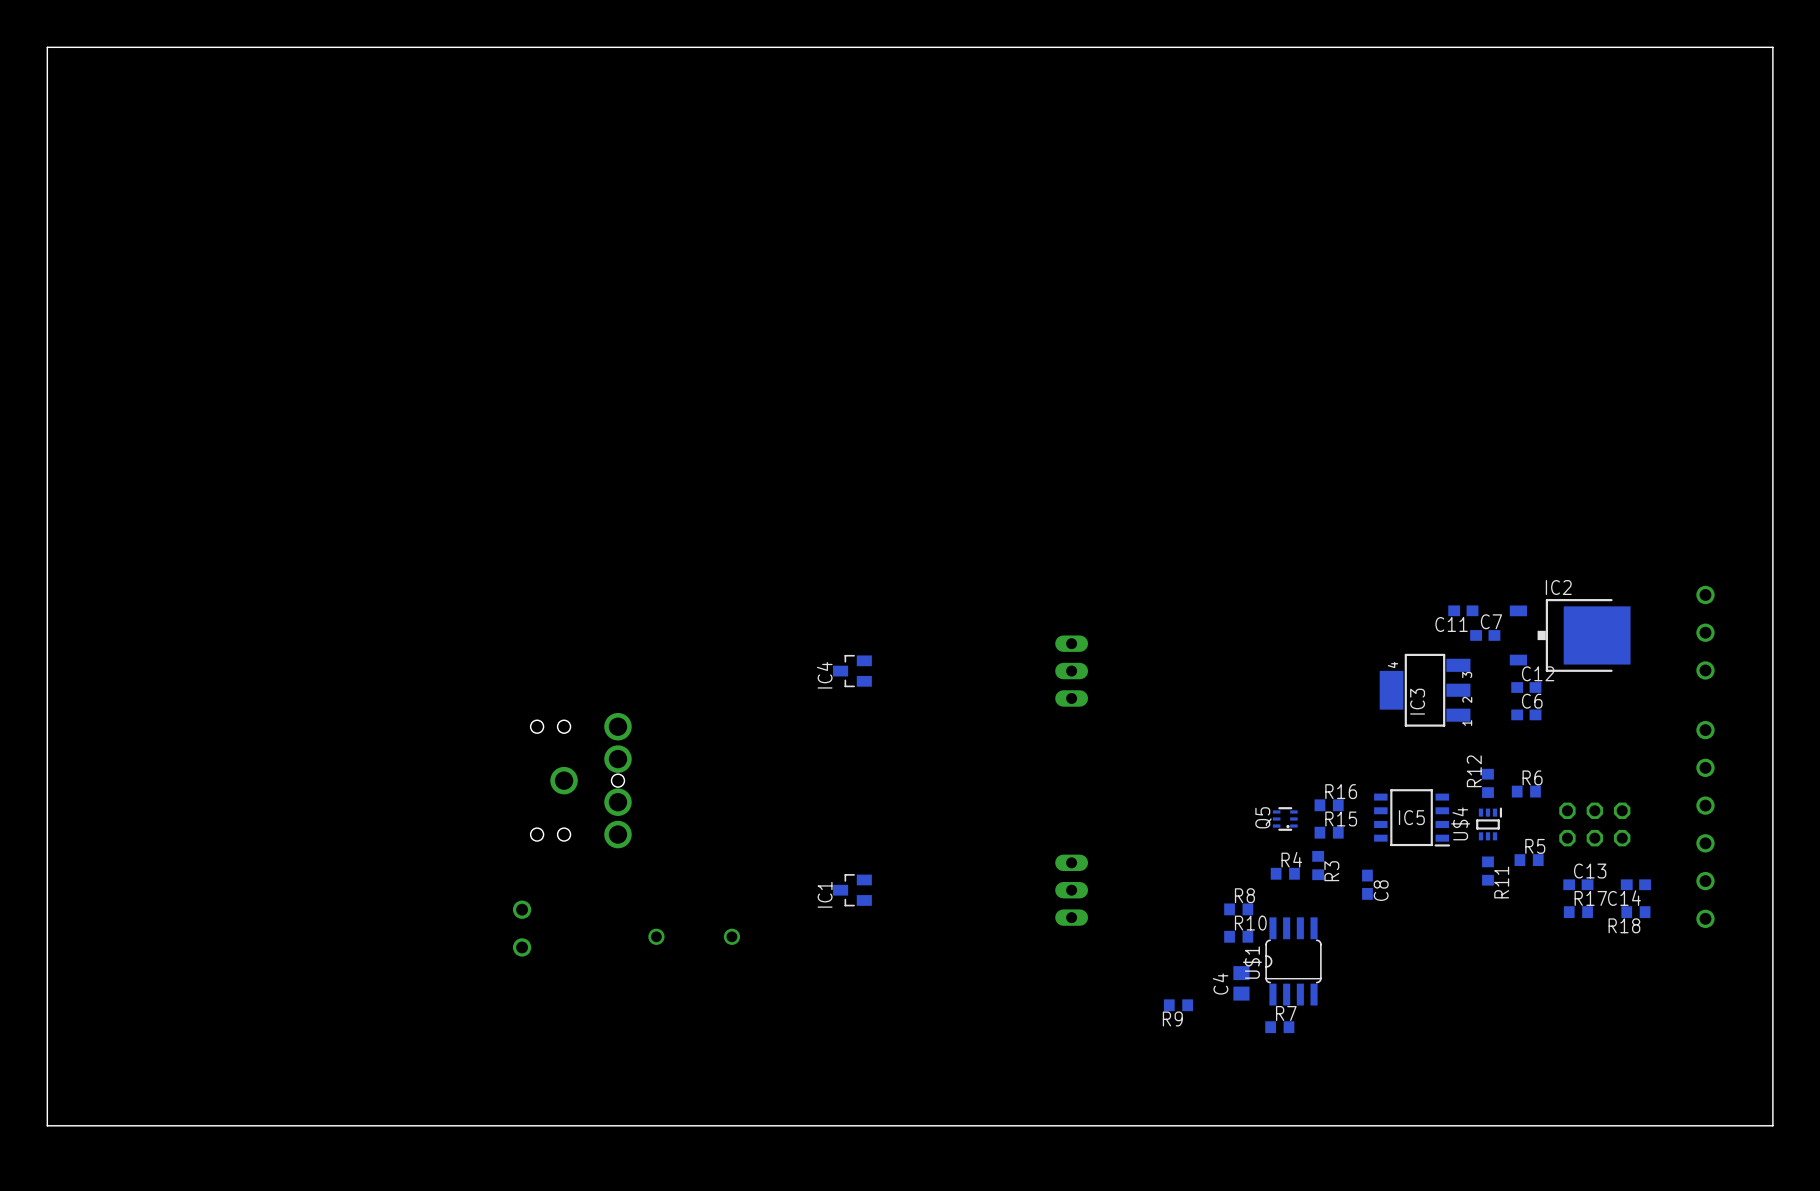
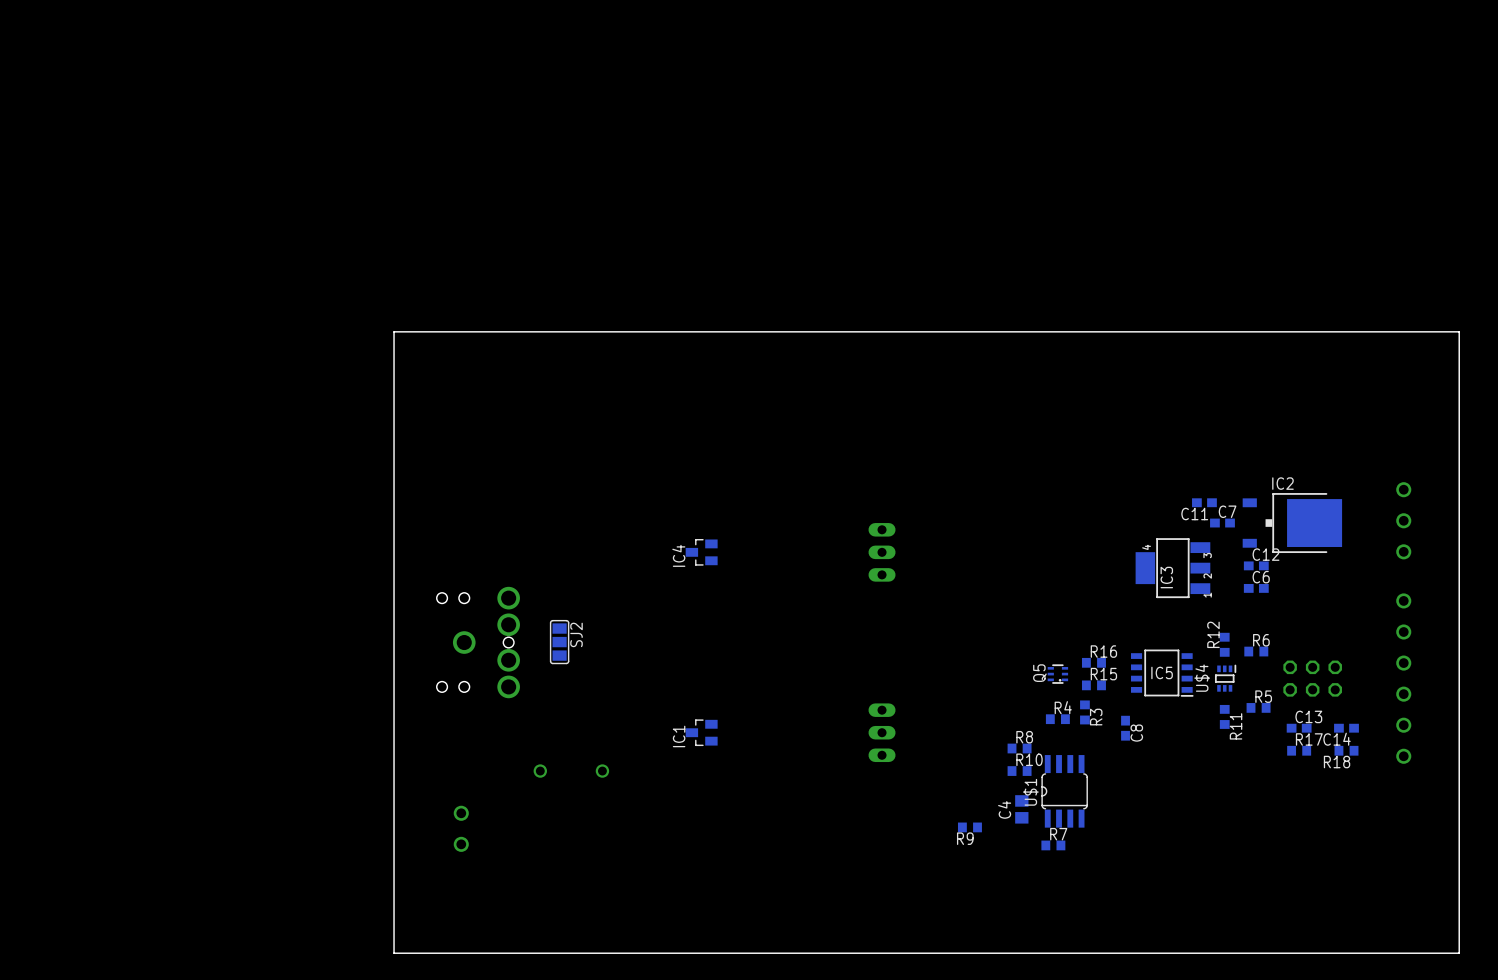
board edge: (1772, 403) (1772, 47) (47, 47) (47, 1125) (1772, 1125) -> (1459, 331) (394, 331) (394, 953) (1459, 953) (1459, 926)
SJ2: none -> (559, 642)
part position: (522, 928) -> (461, 828)

